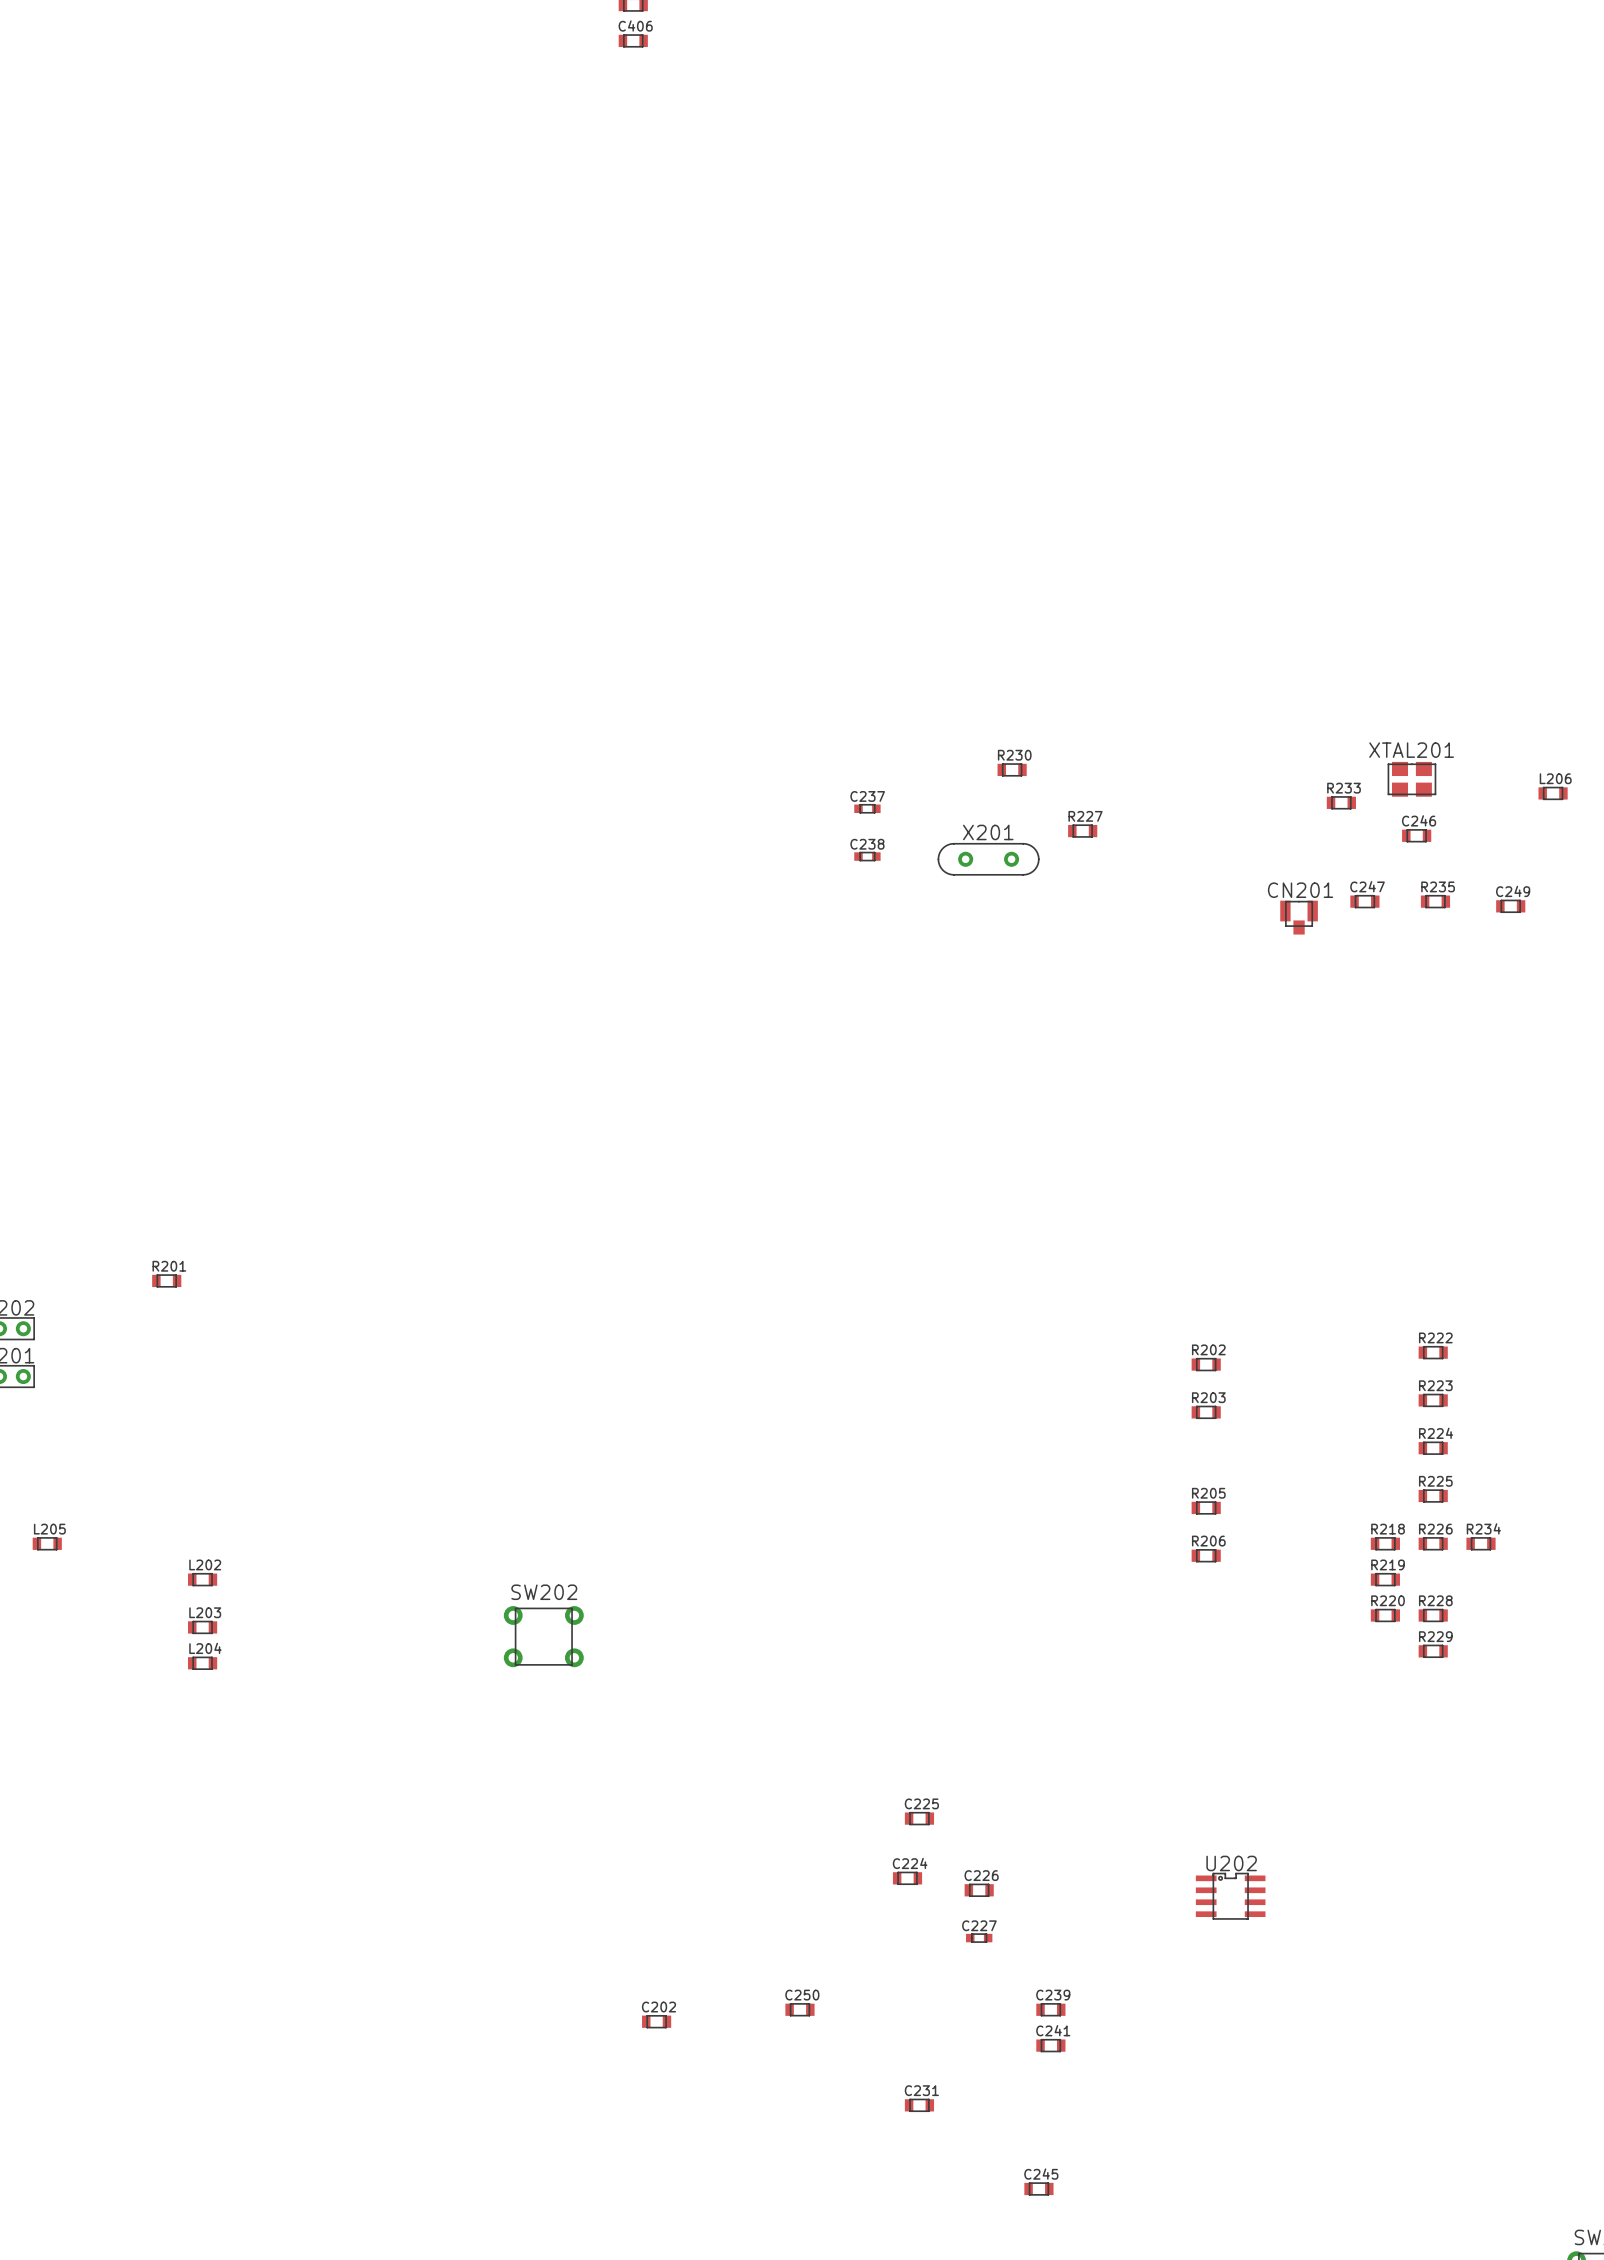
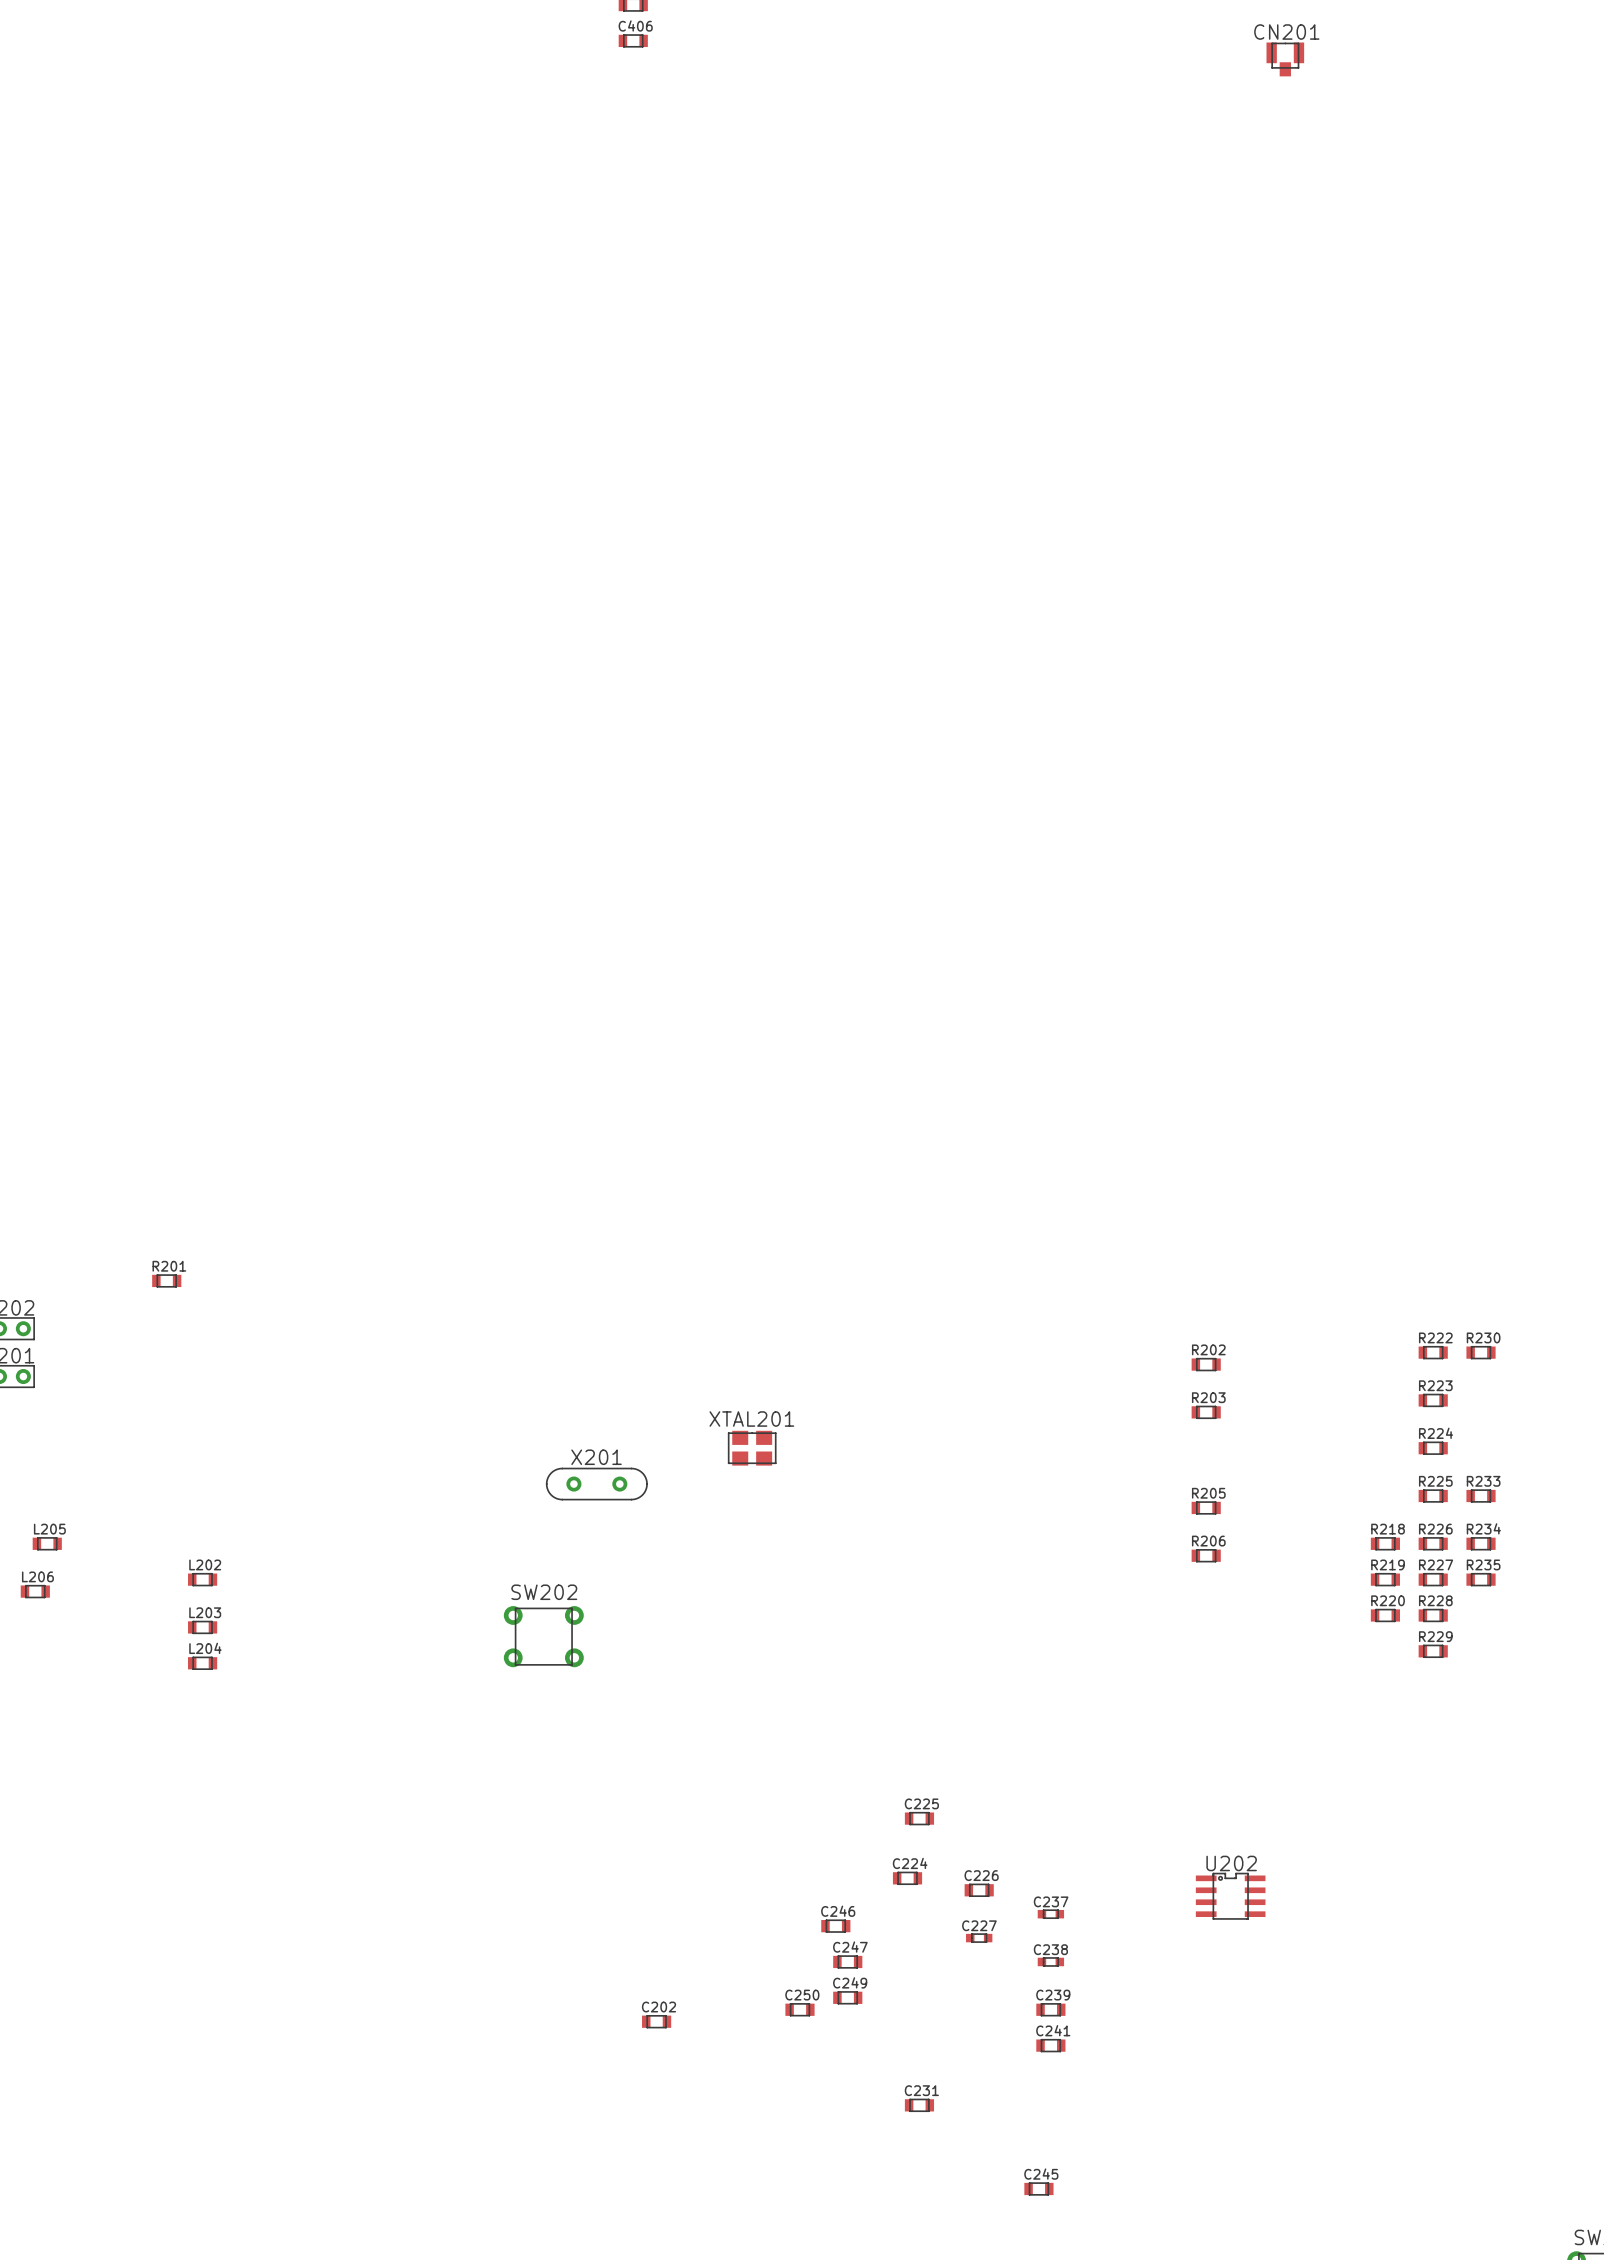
R230 position: (1012, 769) -> (1481, 1352)
XTAL201 position: (1411, 779) -> (752, 1448)
L206 position: (1553, 793) -> (35, 1591)
R233 position: (1341, 802) -> (1481, 1496)
C237 position: (867, 808) -> (1050, 1914)
R227 position: (1082, 831) -> (1433, 1579)
C246 position: (1416, 835) -> (835, 1926)
C238 position: (867, 856) -> (1050, 1961)
X201 position: (988, 859) -> (596, 1484)
C247 position: (1364, 901) -> (847, 1961)
R235 position: (1435, 901) -> (1481, 1579)
C249 position: (1510, 906) -> (847, 1997)
CN201 position: (1299, 917) -> (1285, 59)

